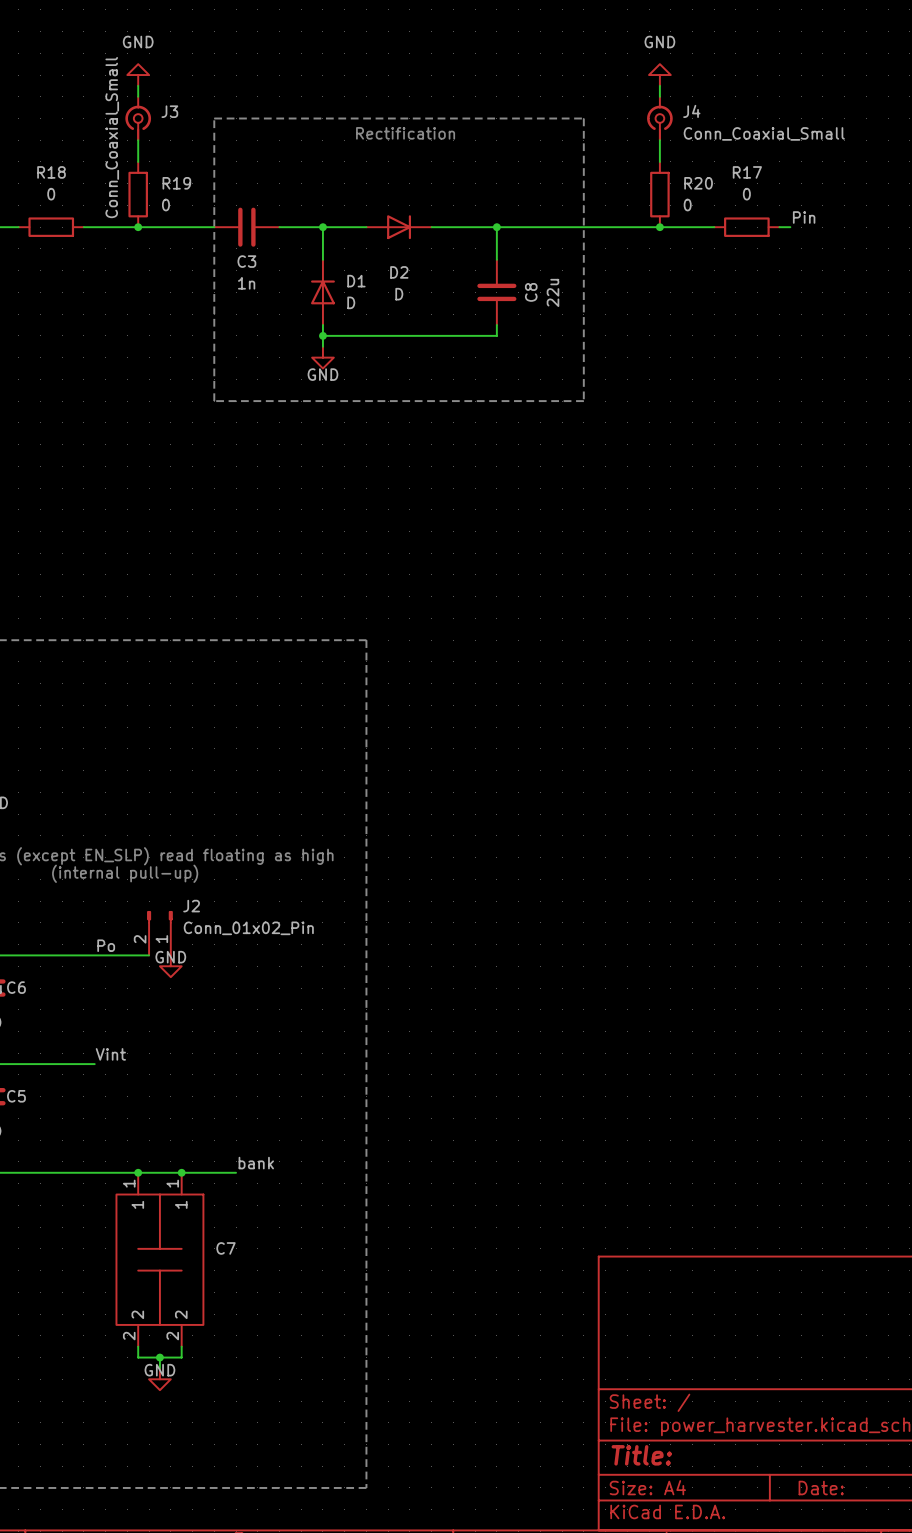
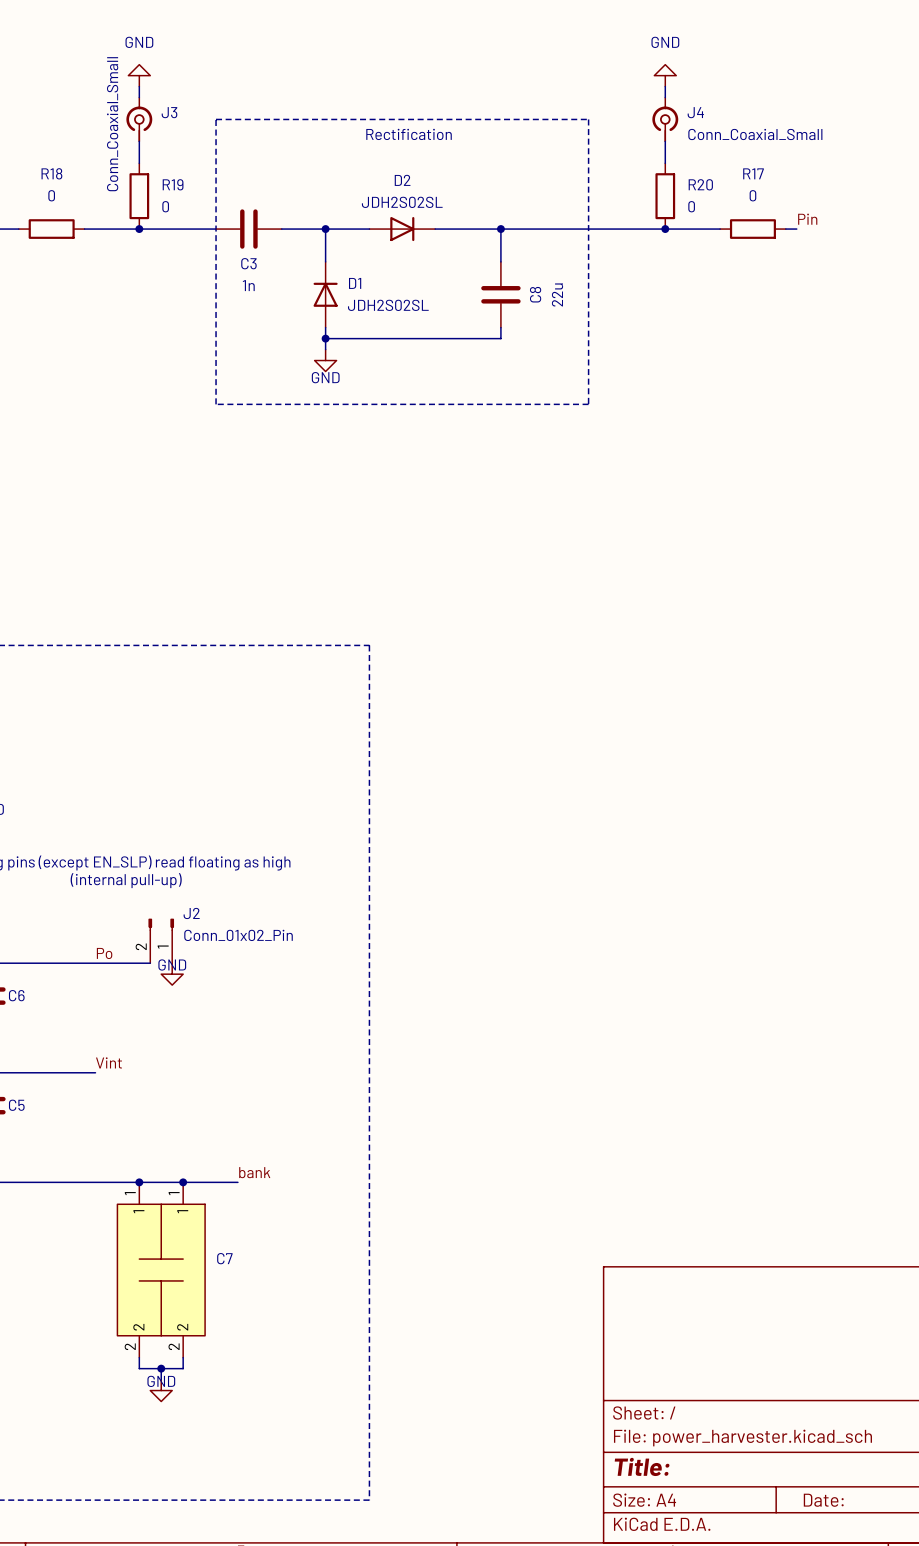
D2 name position: D2 (399, 272) -> D2 (402, 180)
D2 value: D (399, 294) -> JDH2S02SL (402, 202)
D1 value: D (351, 302) -> JDH2S02SL (388, 305)

